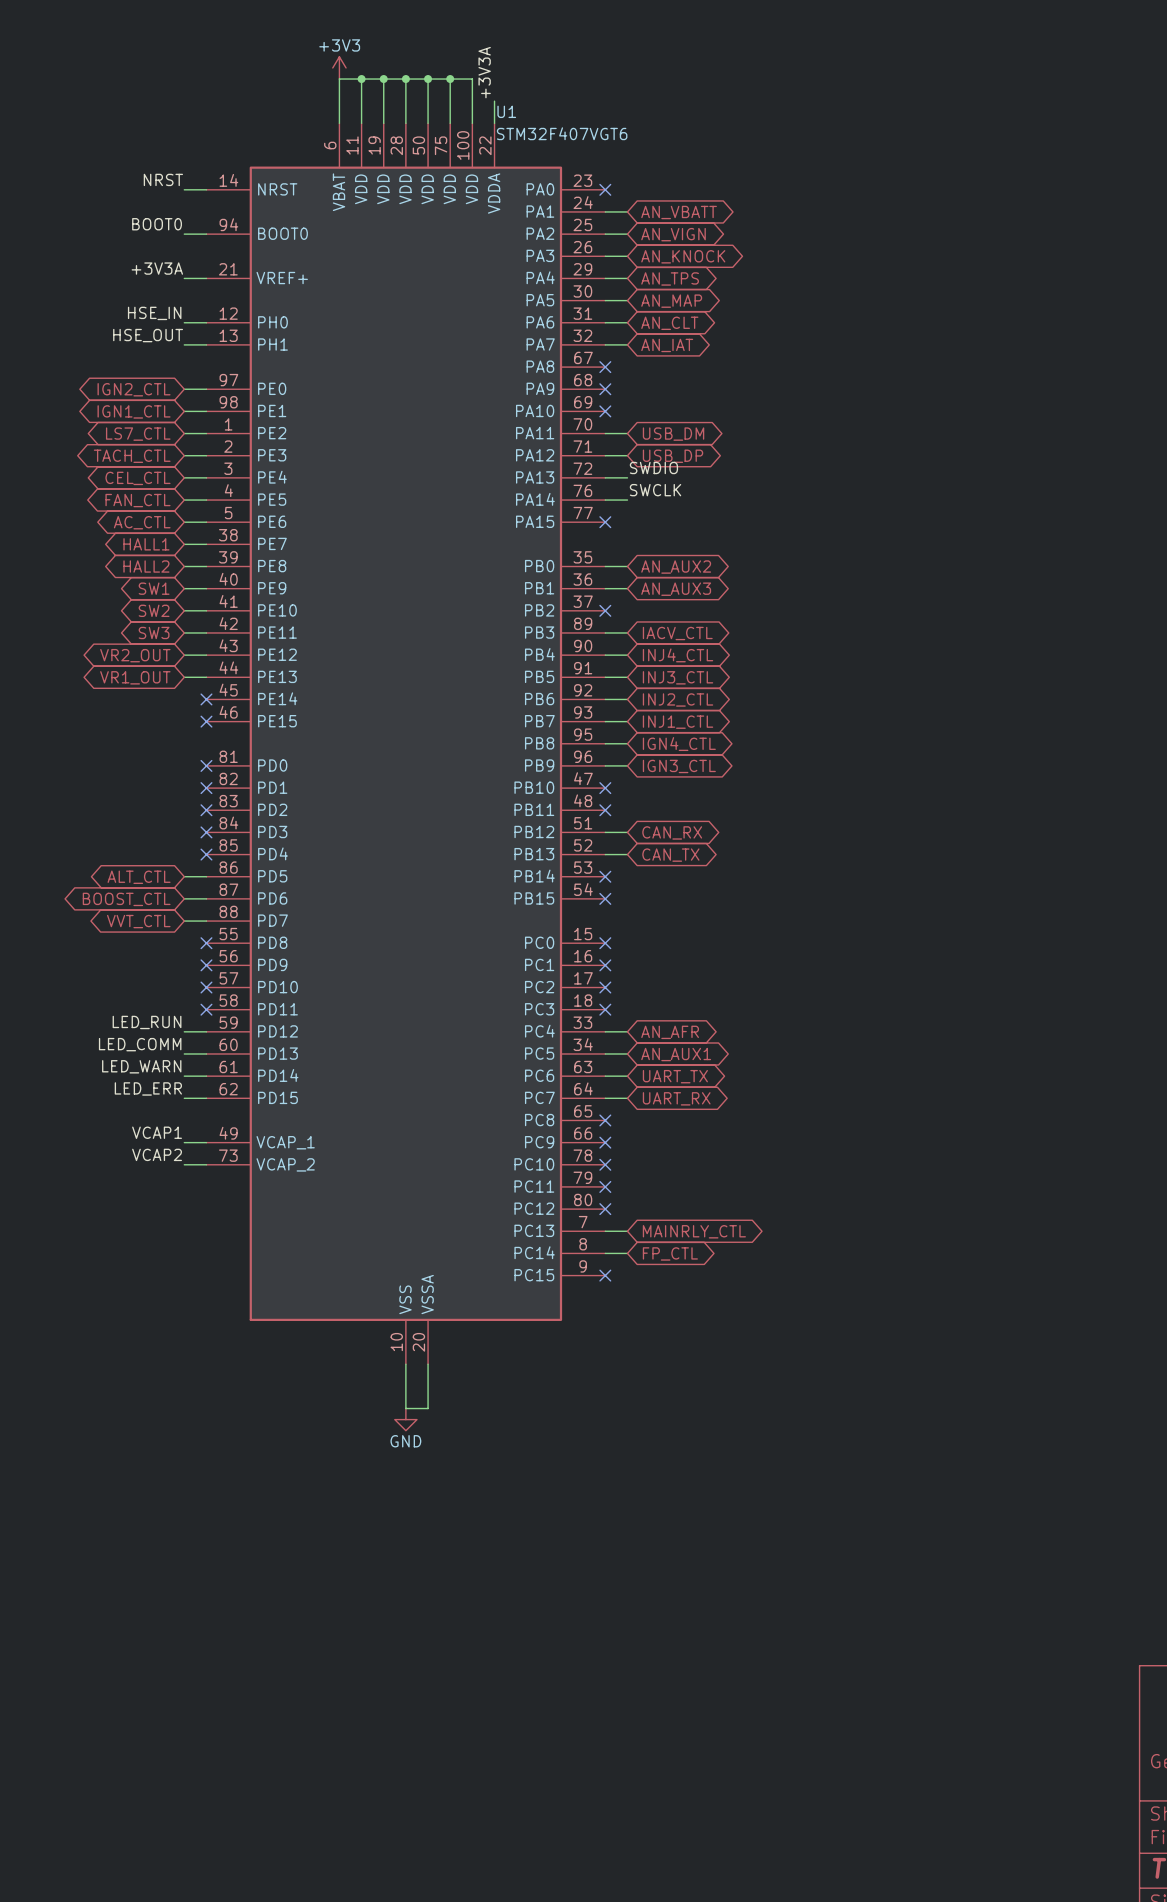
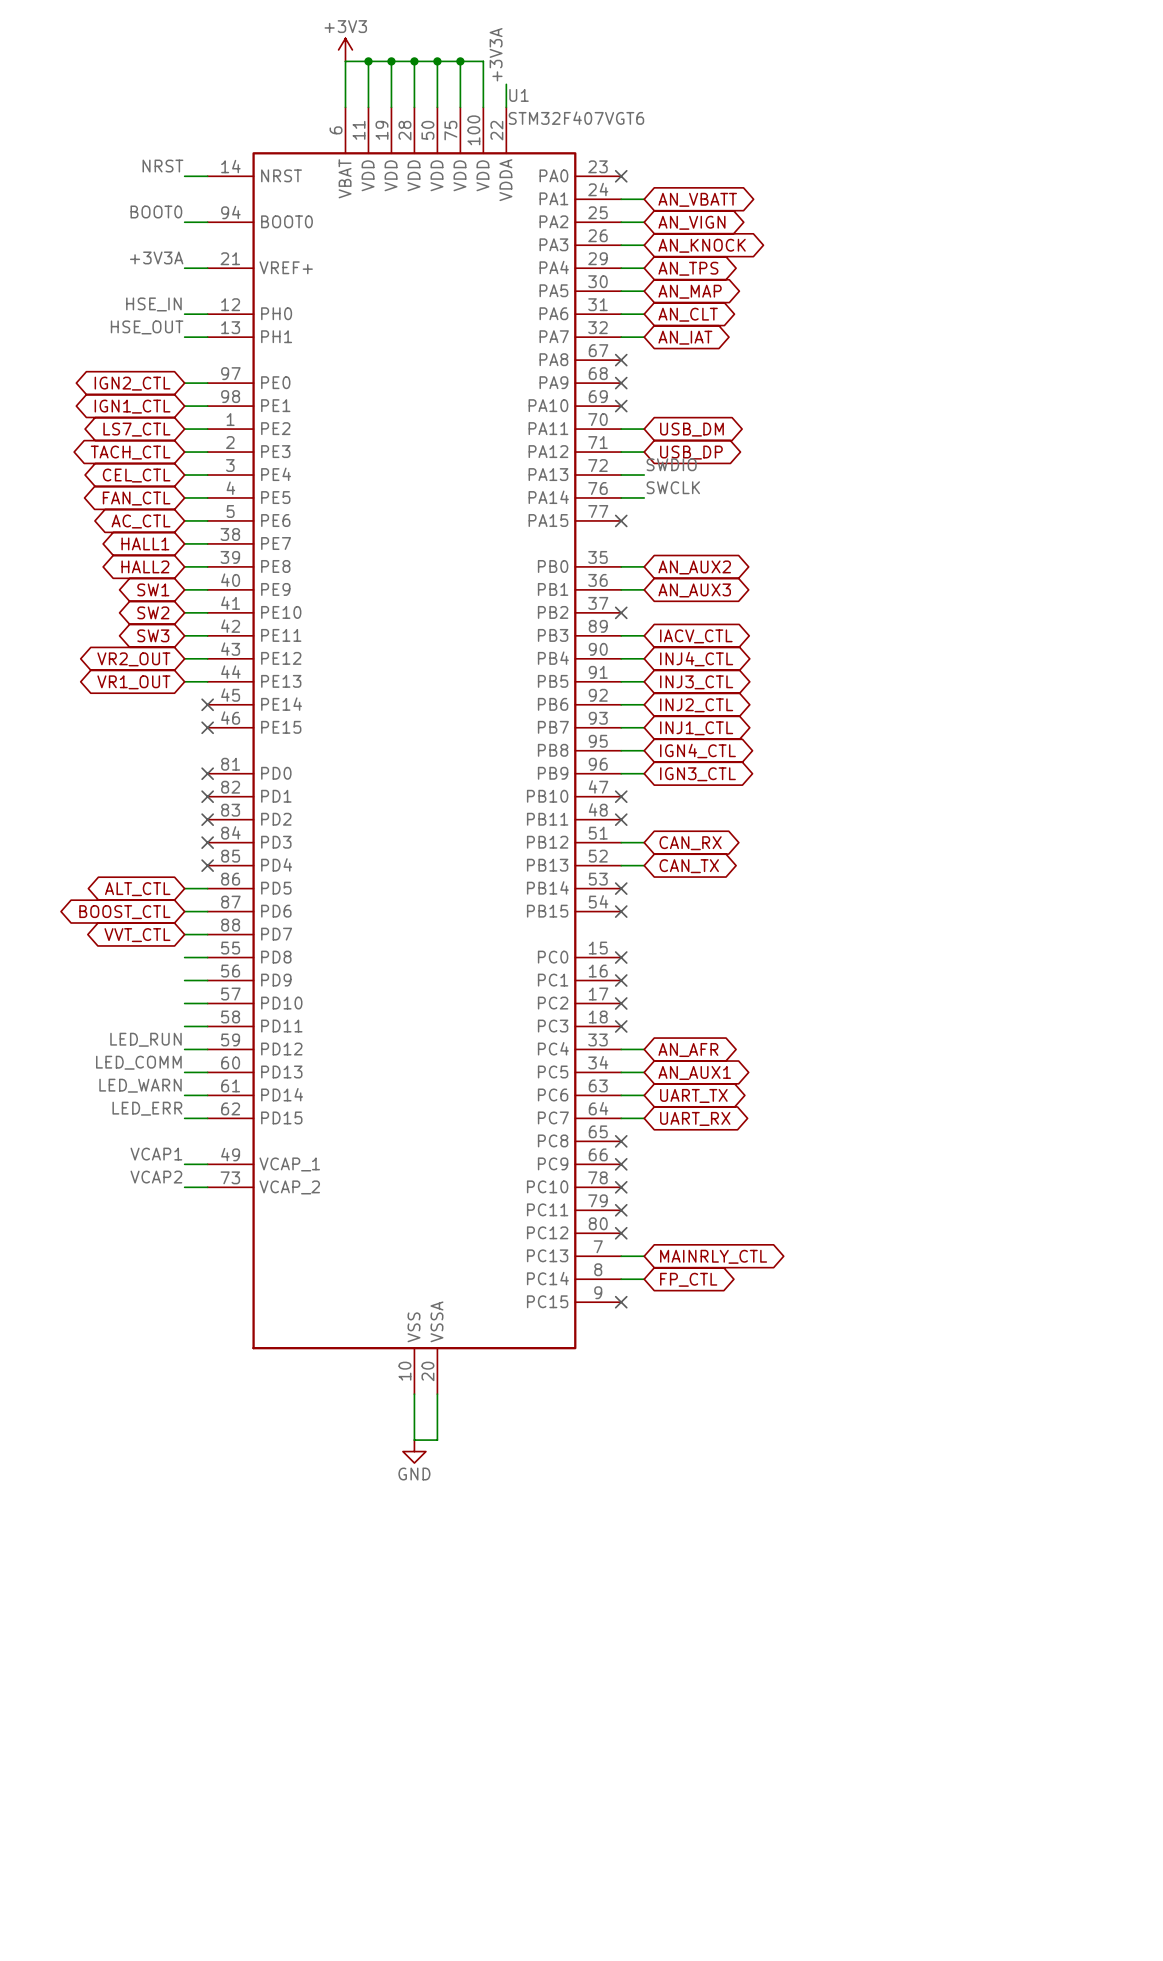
wire: none -> (184, 957) (207, 957)
no-connect mark: (206, 943) -> none
wire: none -> (184, 980) (207, 980)
no-connect mark: (206, 965) -> none
wire: none -> (184, 1003) (207, 1003)
no-connect mark: (206, 987) -> none
wire: none -> (184, 1026) (207, 1026)
no-connect mark: (206, 1009) -> none

